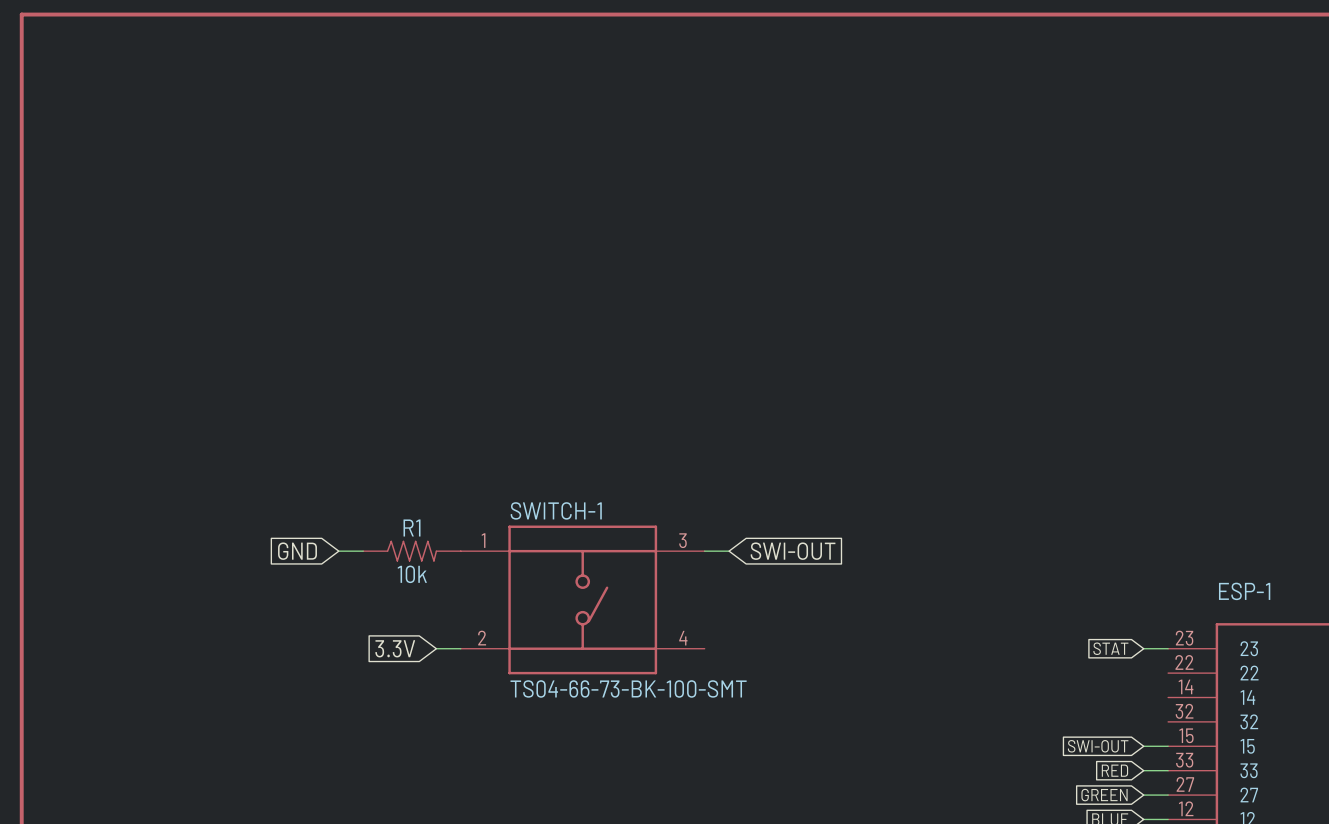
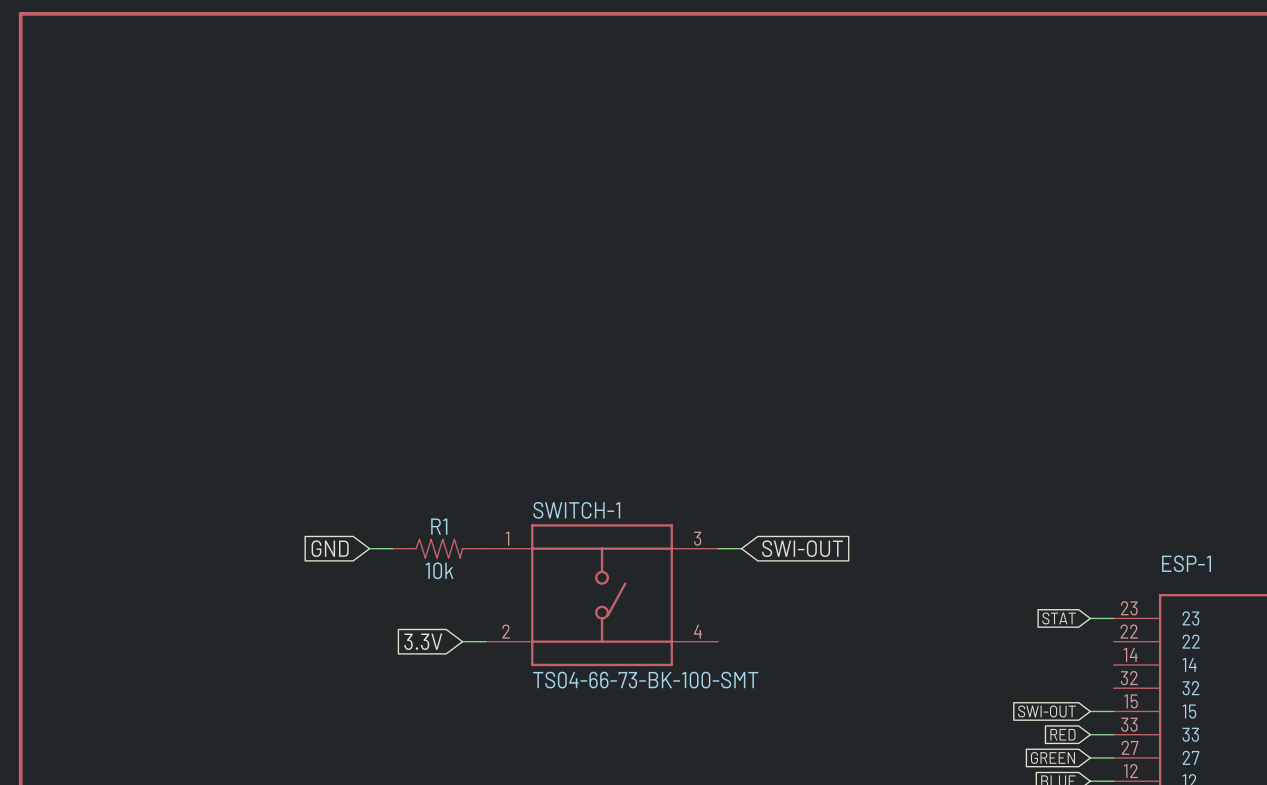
global label position: GND (297, 551) -> GND (330, 548)
wire: (338, 551) (363, 551) -> (369, 548) (392, 548)
R1 position: (411, 551) -> (439, 548)
wire: (704, 551) (729, 551) -> (718, 548) (741, 548)
global label position: SWI-OUT (793, 551) -> SWI-OUT (802, 548)
SWITCH-1 position: (582, 599) -> (602, 595)
global label position: 3.3V (395, 648) -> 3.3V (423, 641)
wire: (436, 648) (460, 648) -> (462, 641) (485, 641)

